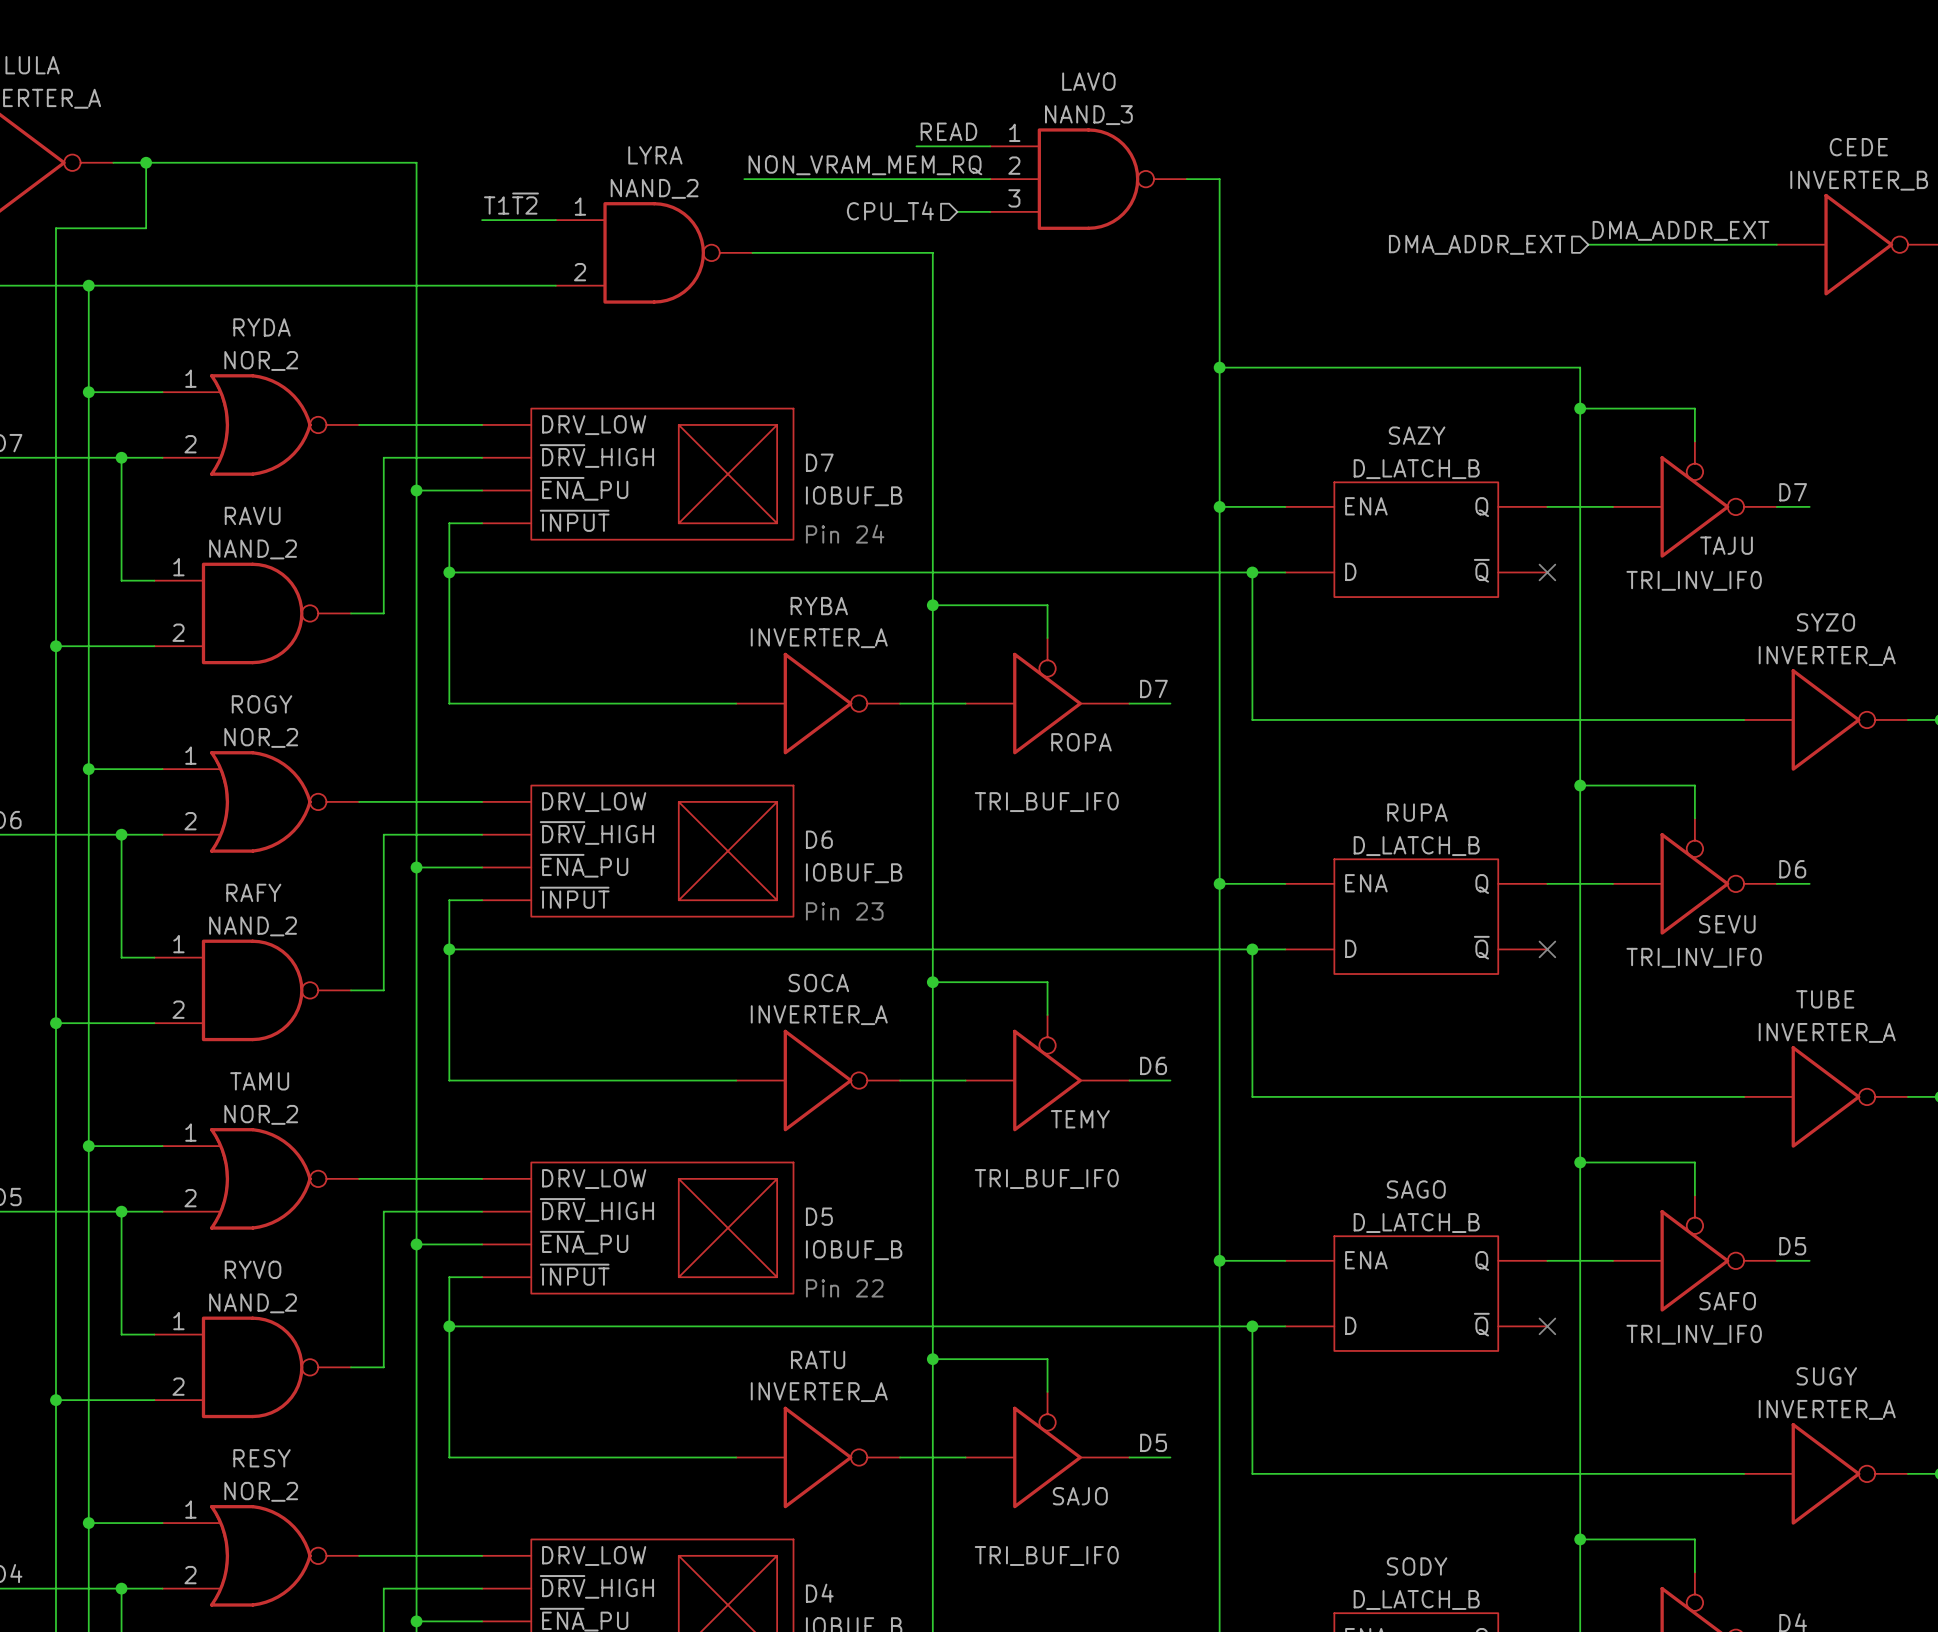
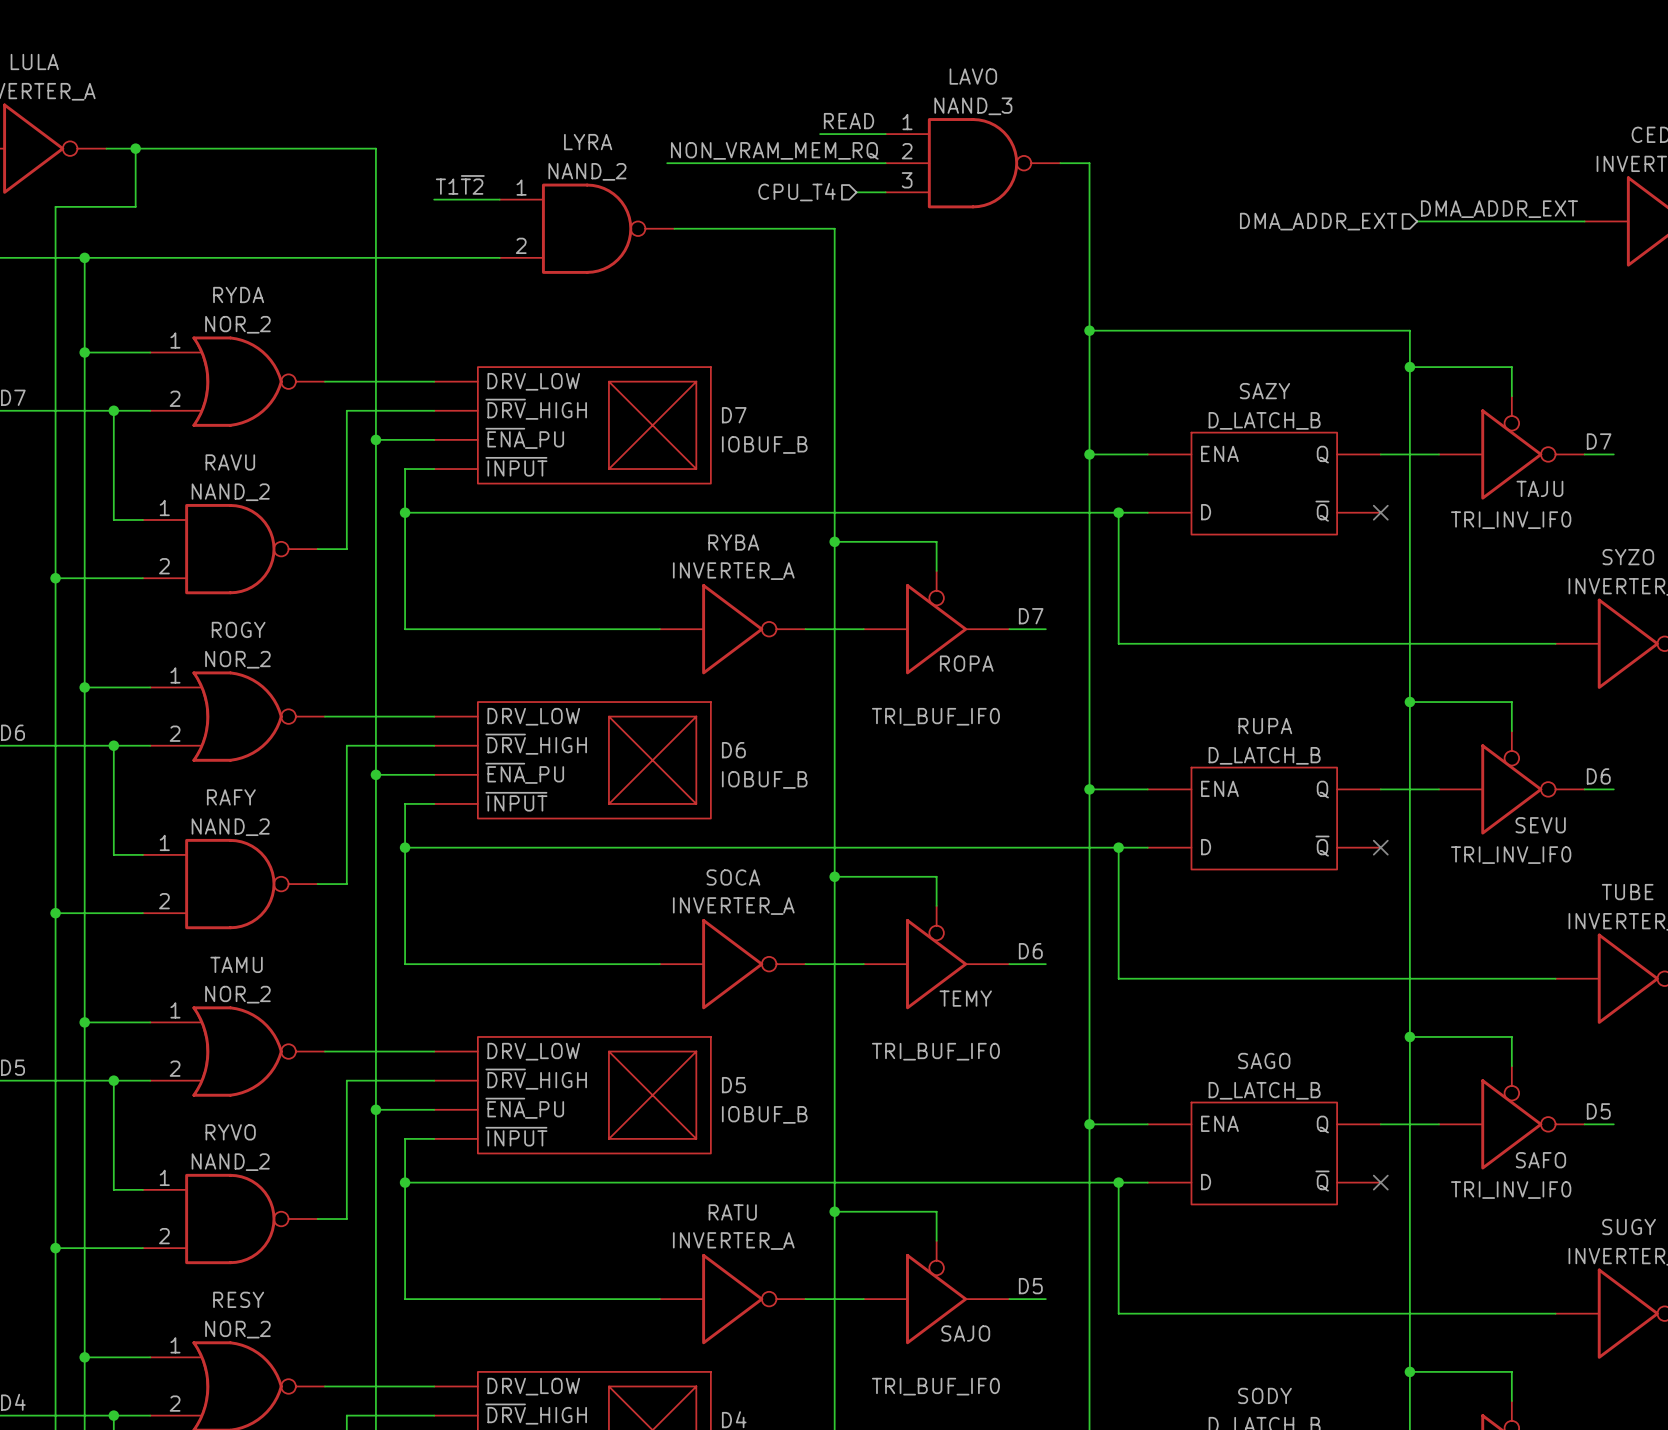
text: Pin 24 (845, 534) -> none
text: Pin 23 (844, 911) -> none
text: Pin 22 (844, 1288) -> none

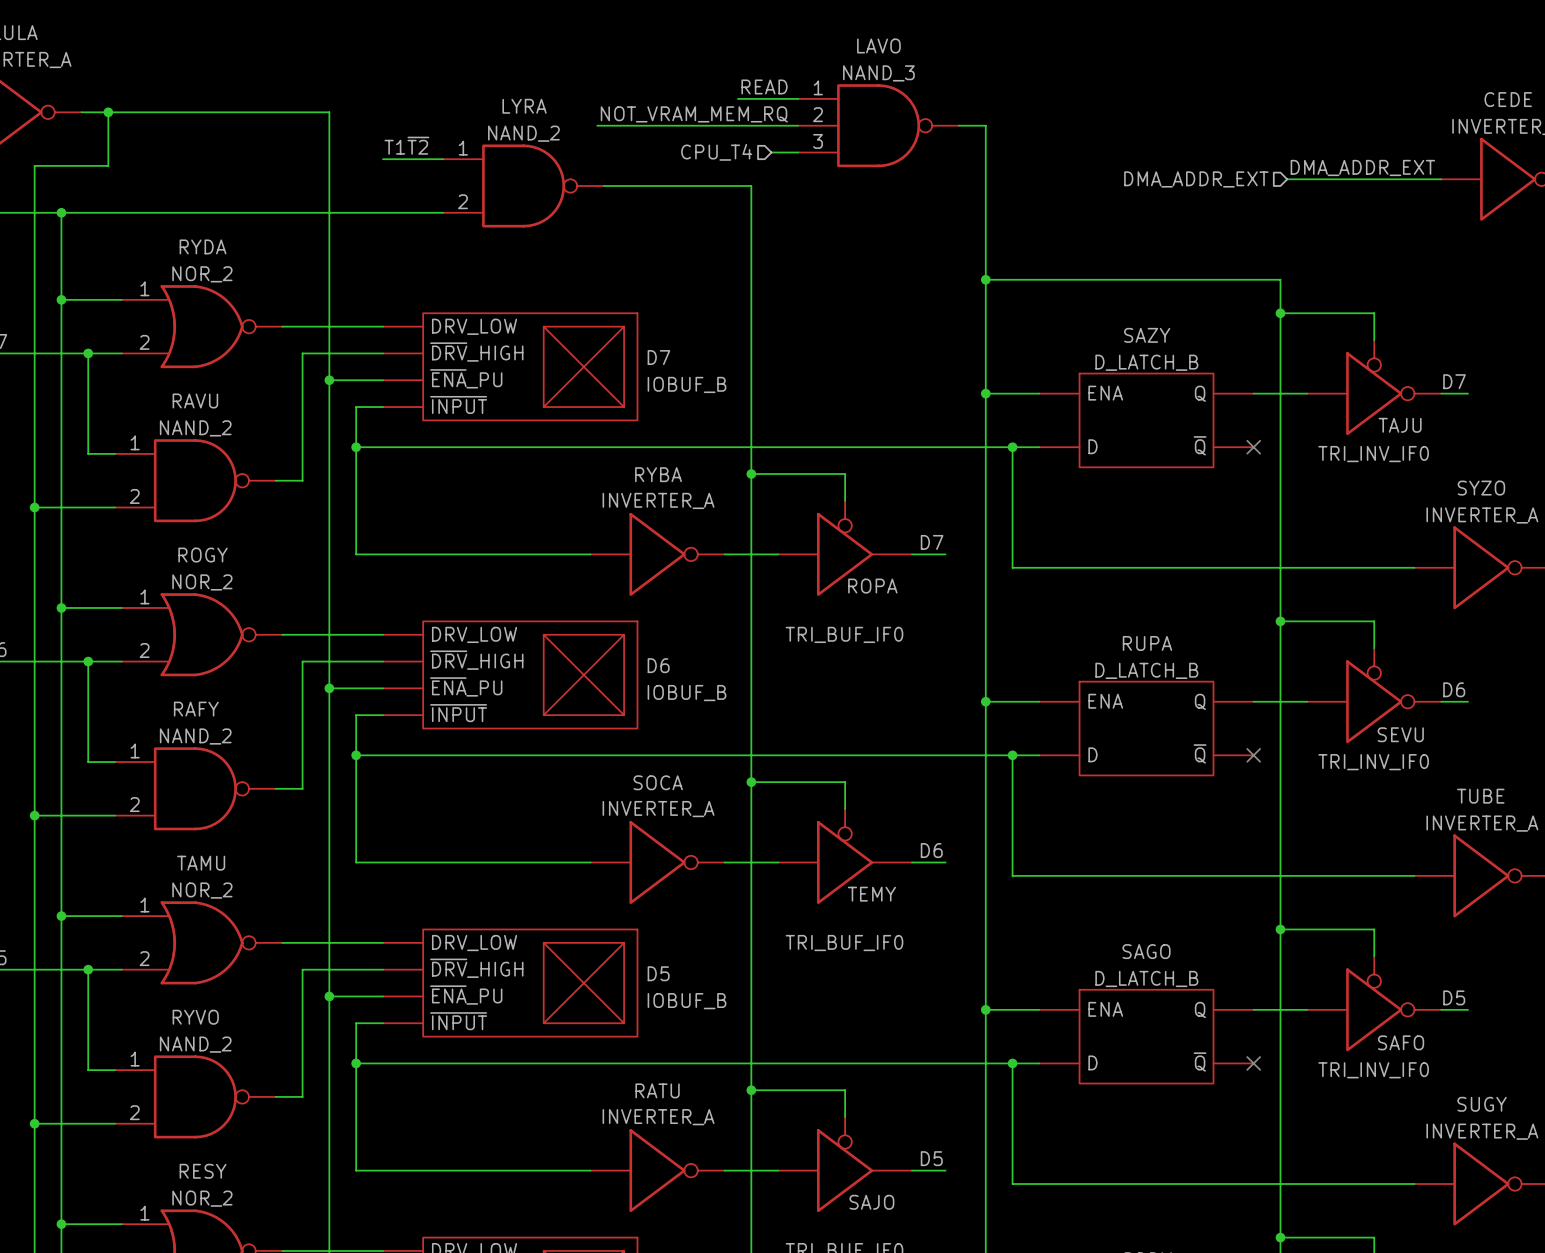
label: NON_VRAM_MEM_RQ (774, 150) -> NOT_VRAM_MEM_RQ (694, 114)

